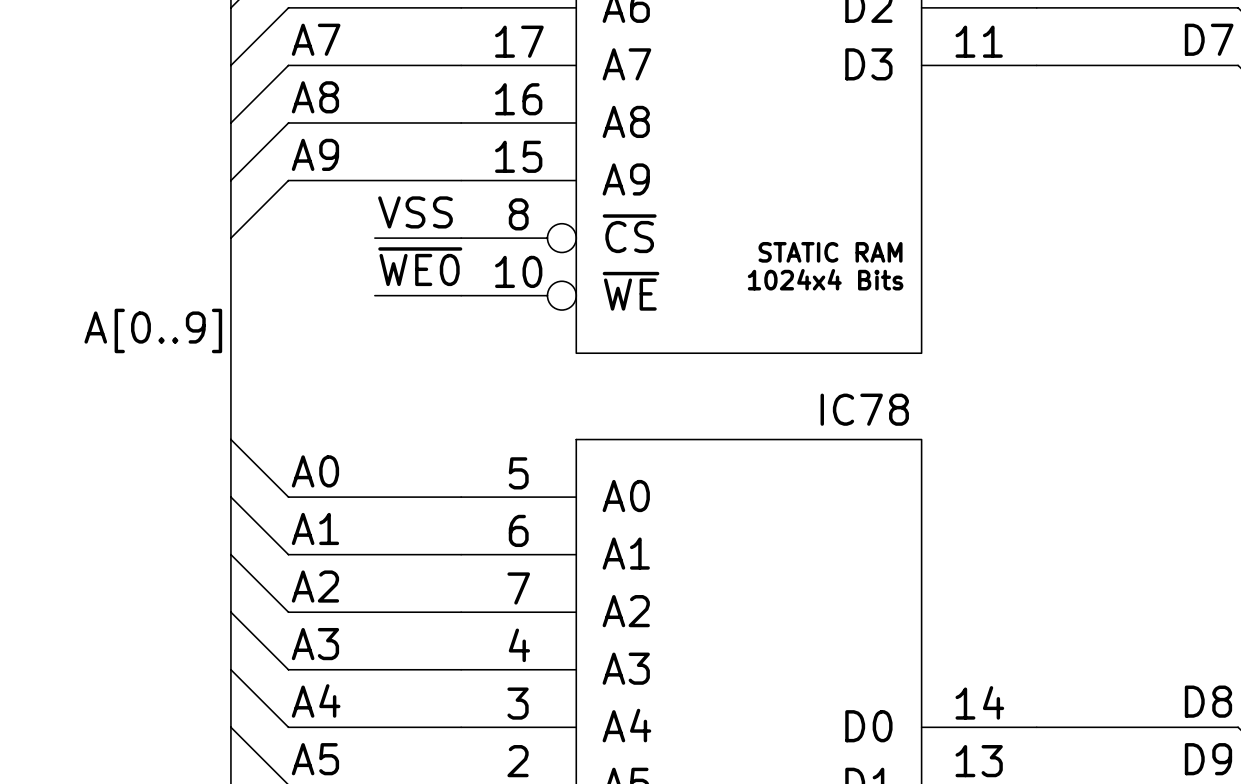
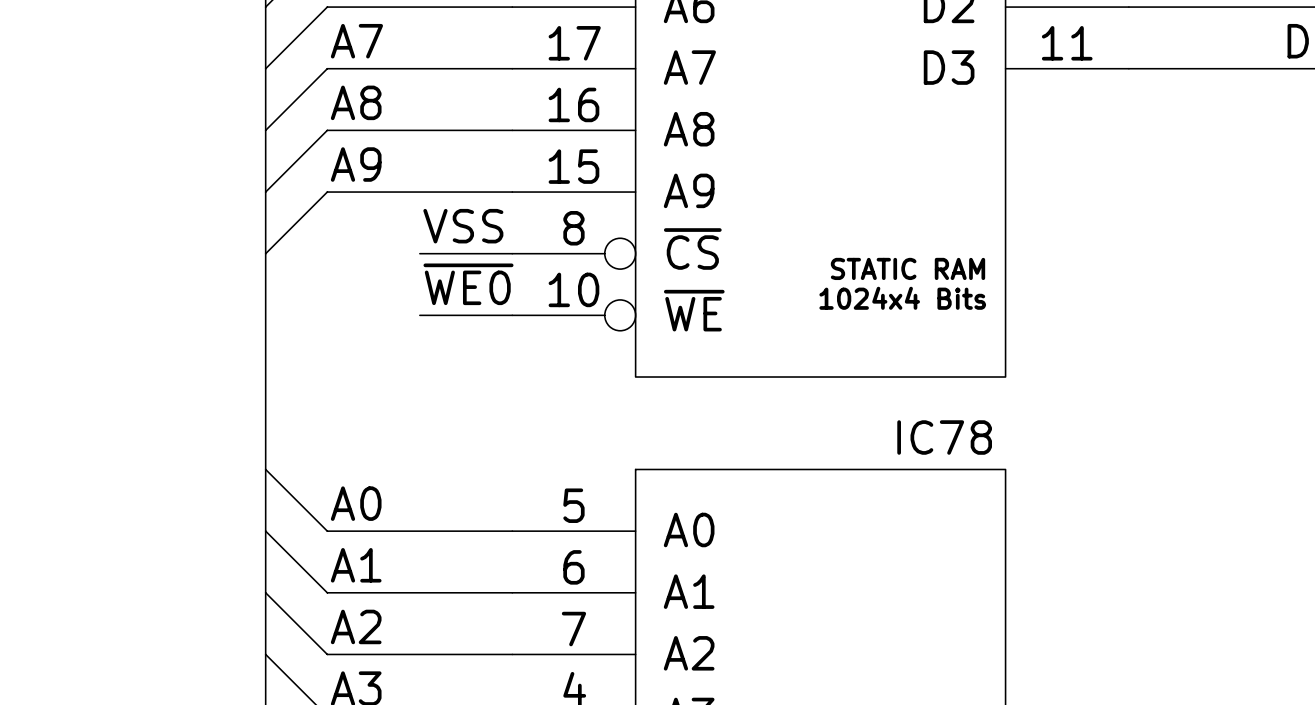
label: A[0..9] (153, 330) -> none

